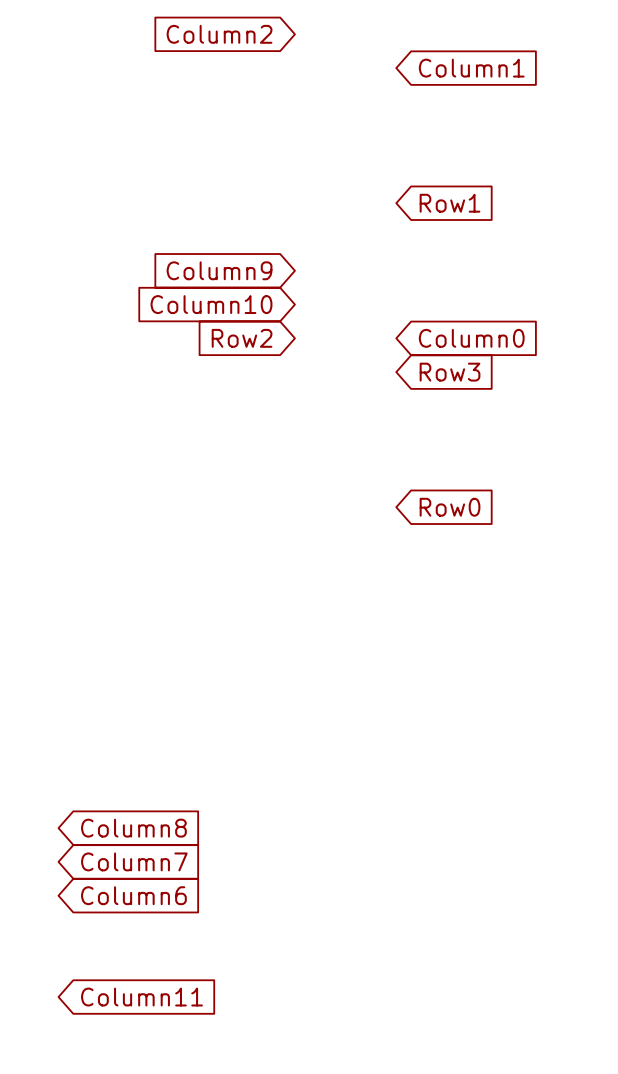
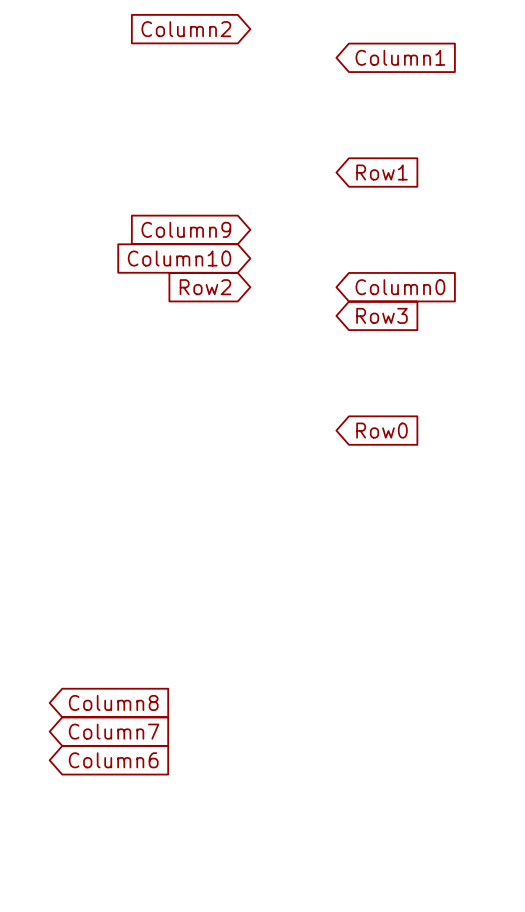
global label: Column11 (141, 997) -> none

